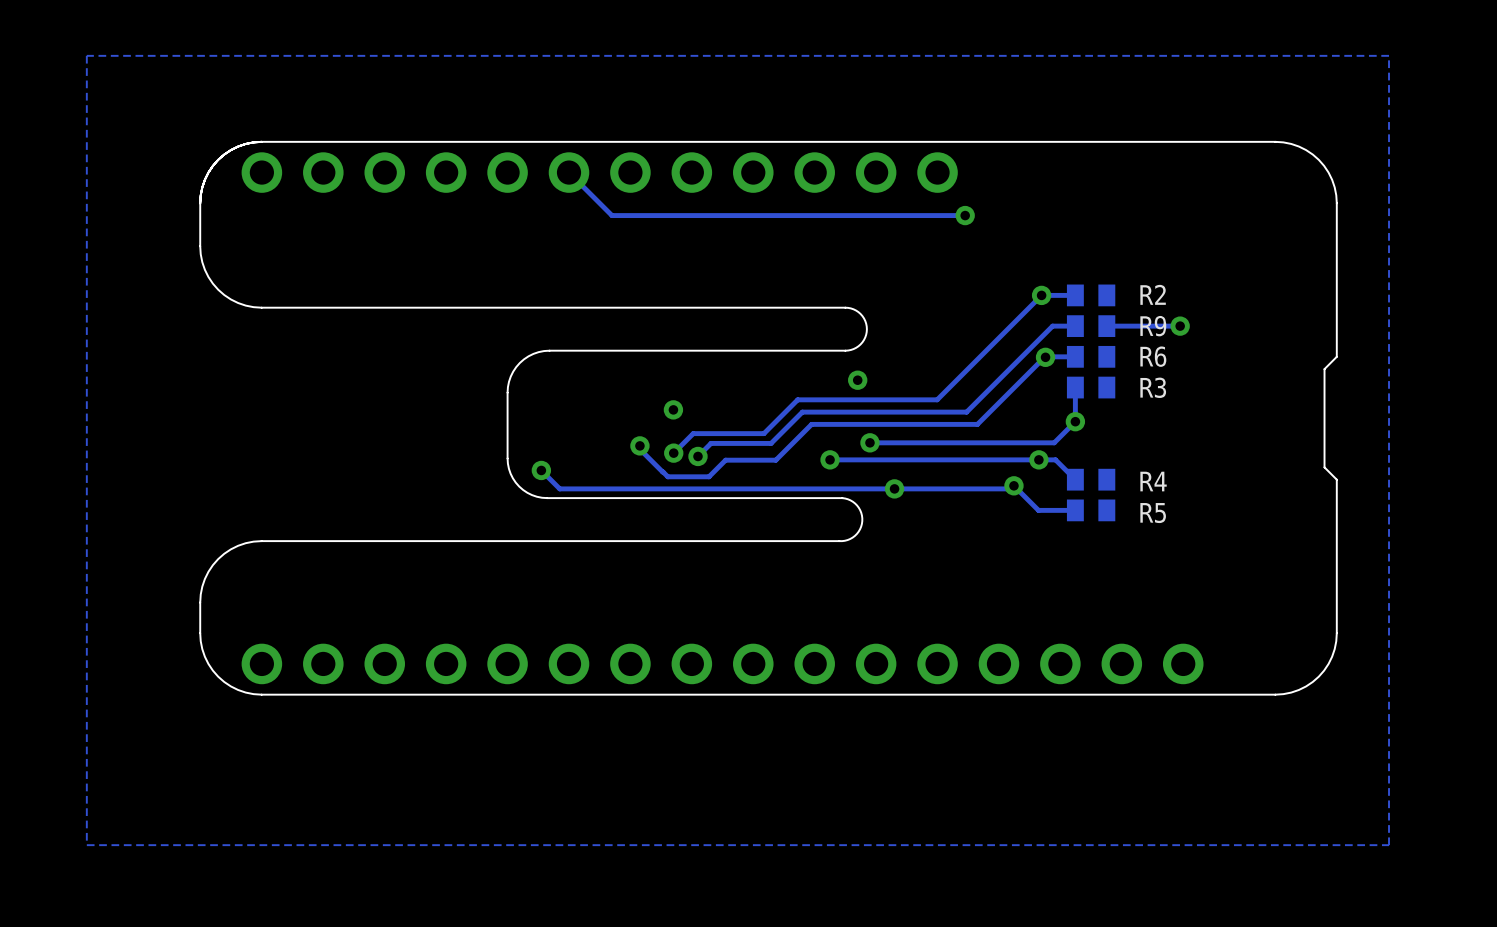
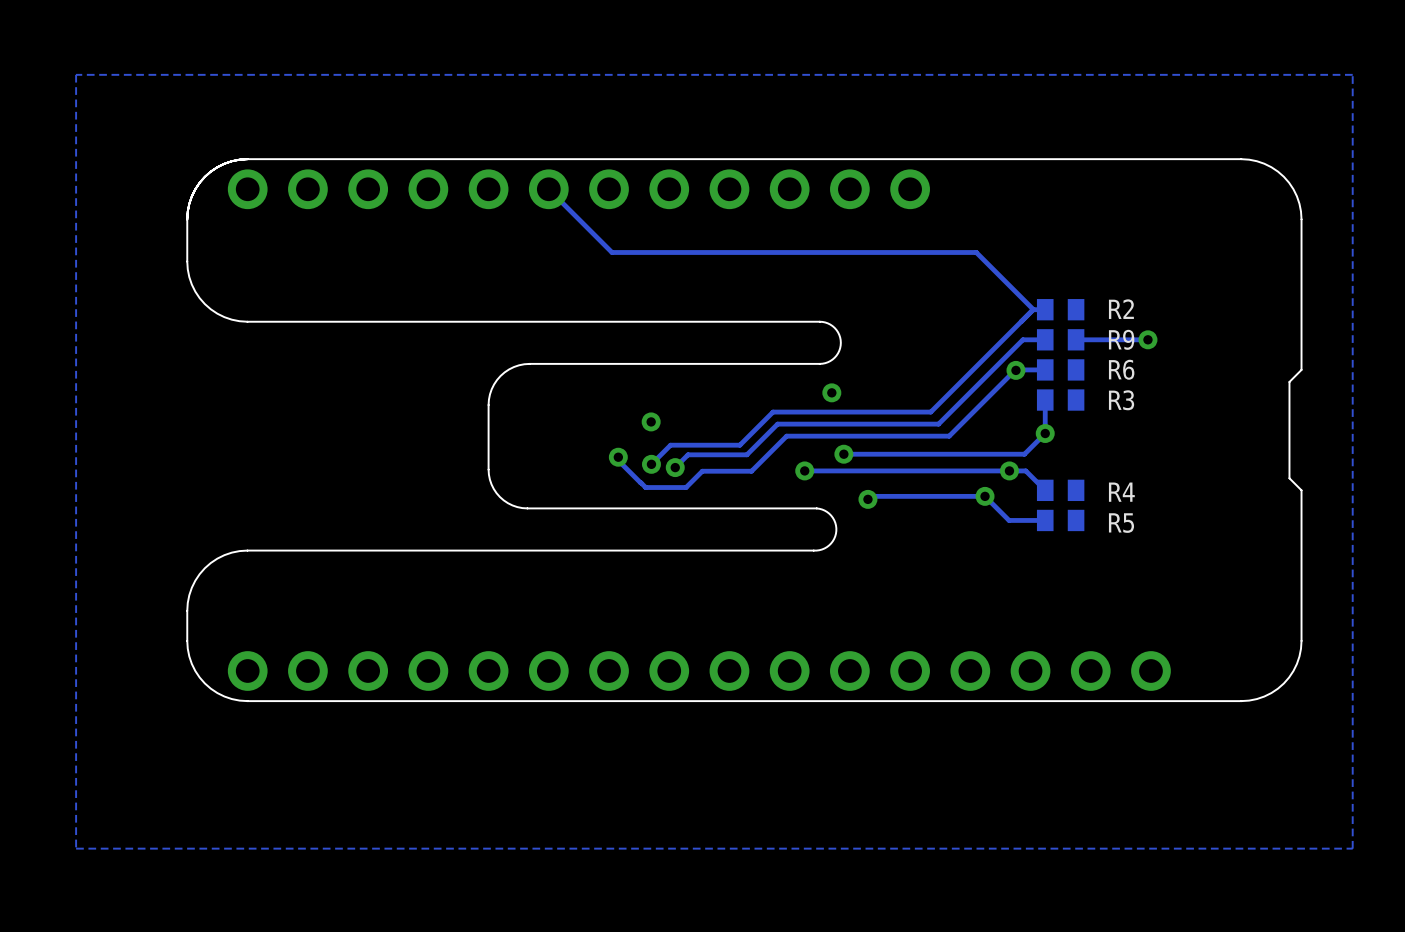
track: (965, 215) (612, 215) -> (909, 412) (930, 412) (1033, 309) (976, 252) (612, 252) (590, 231)
via: (965, 215) -> none
via: (1041, 295) -> none
track: (1063, 295) (1041, 295) (937, 399) -> none
track: (541, 470) (559, 488) (1010, 488) (1013, 485) -> (867, 496) (985, 496)
via: (541, 470) -> none

